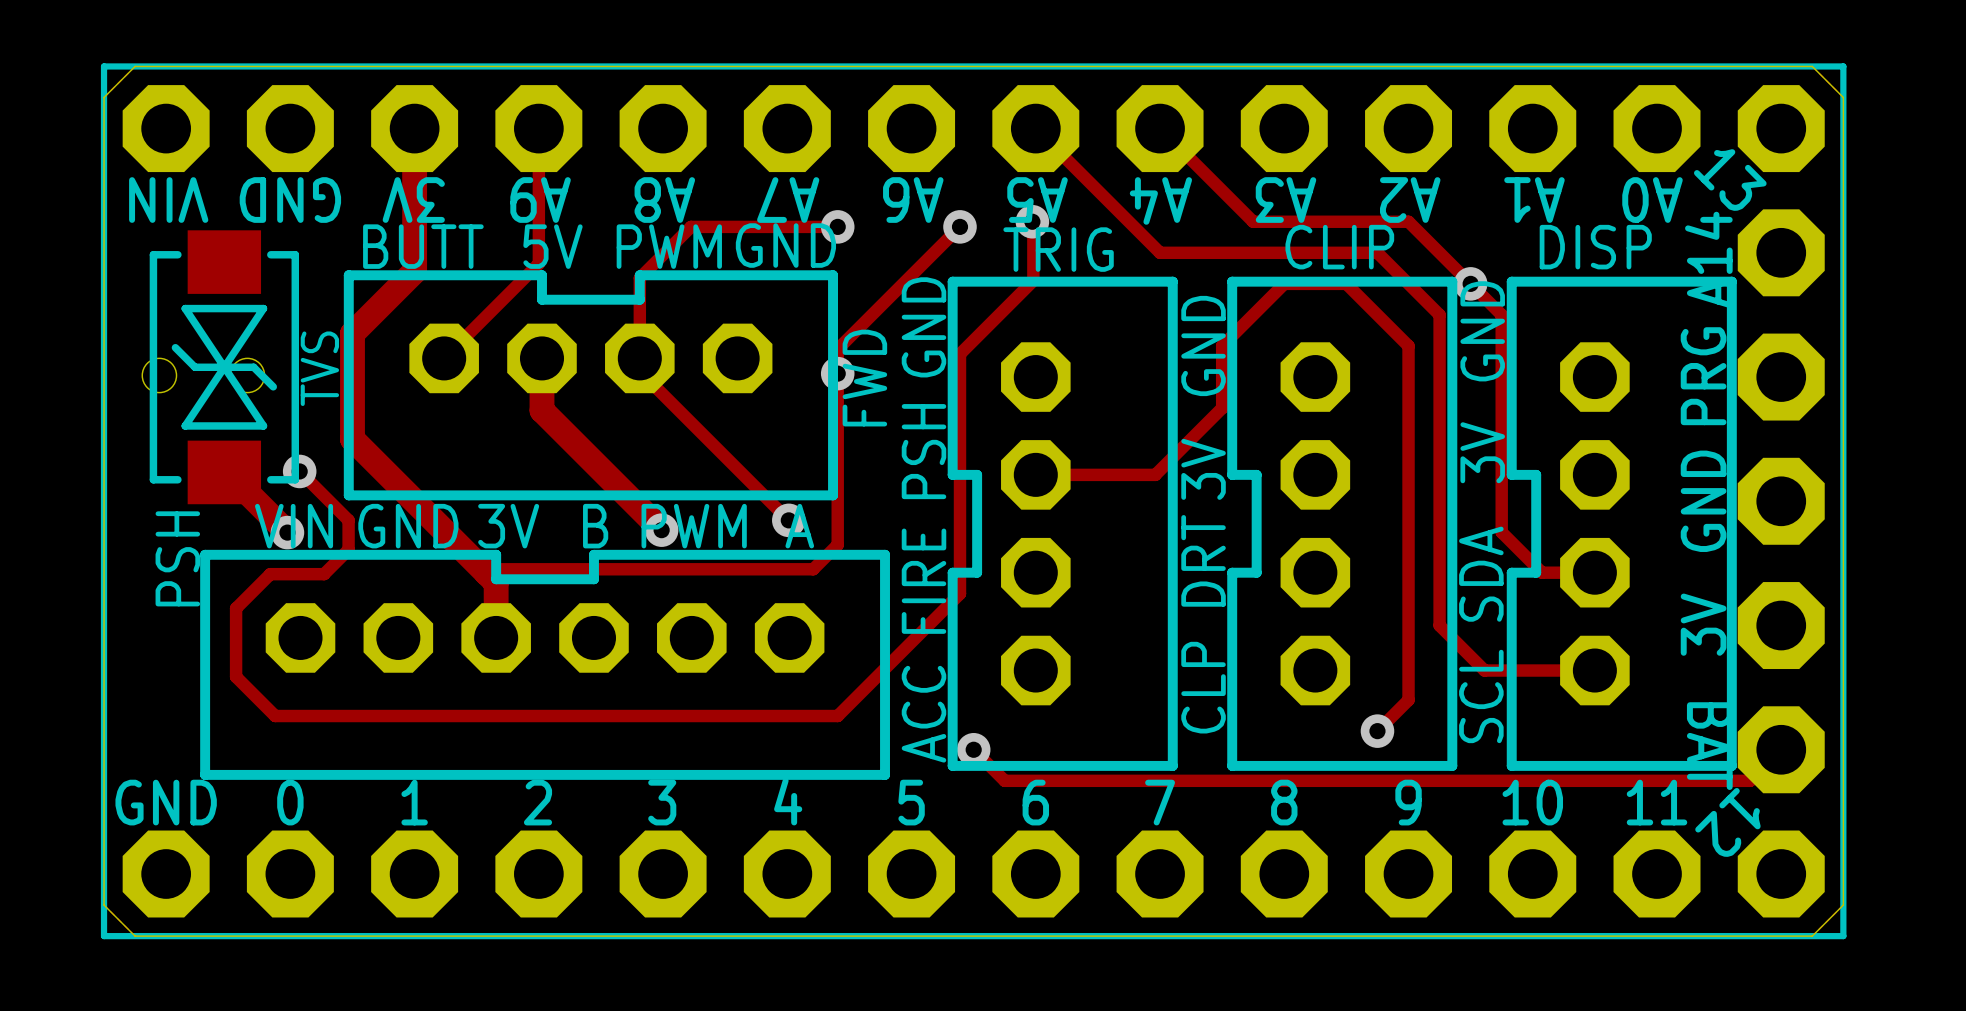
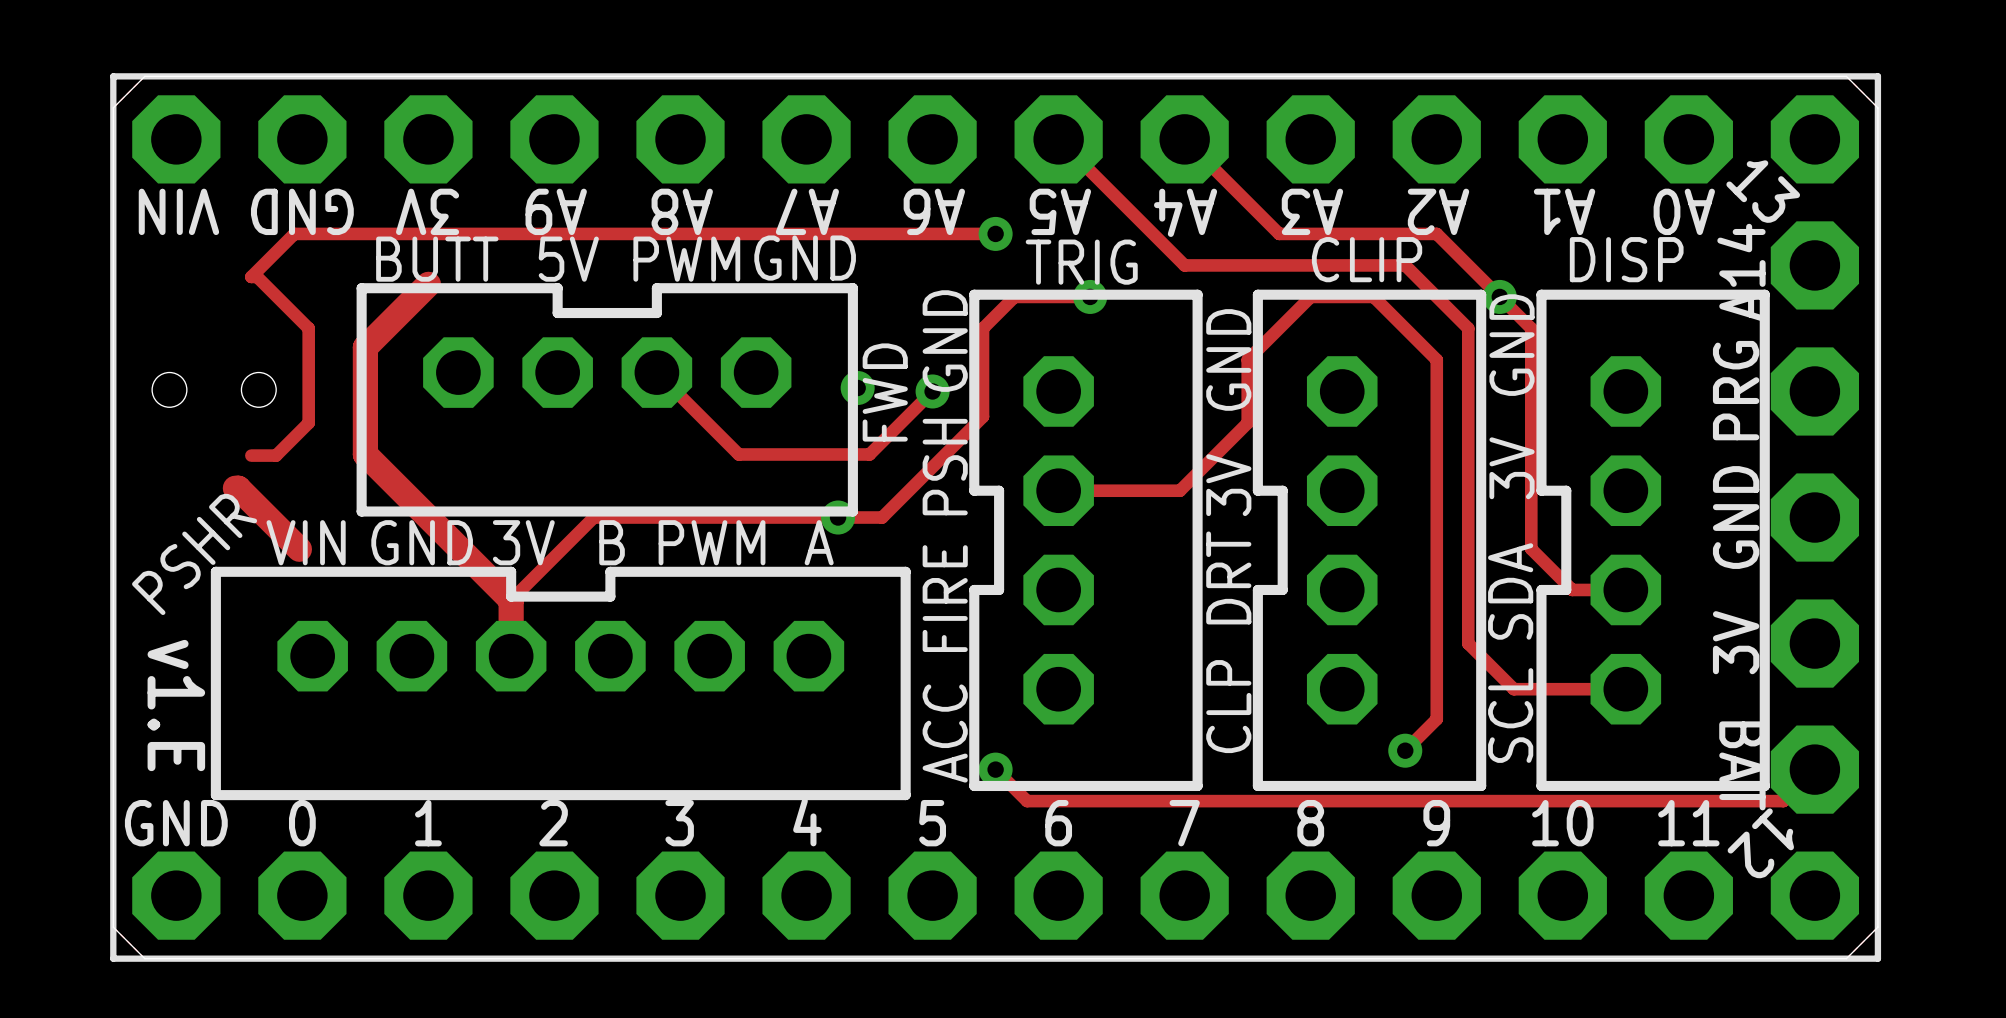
track: (414, 128) (414, 271) -> none
track: (538, 128) (538, 263) (444, 358) -> none
track: none -> (995, 233) (294, 233) (251, 276) (257, 276) (308, 328) (308, 422) (276, 455) (251, 455)
track: (1032, 221) (1033, 280) (960, 354) (960, 593) (837, 716) (275, 716) (236, 676) (236, 608) (270, 574) (324, 574) (348, 549) (348, 520) (299, 471) -> none
via: (1032, 221) -> none
track: (837, 226) (690, 226) (639, 278) (639, 371) (788, 520) -> none
via: (837, 226) -> none
track: (960, 226) (837, 349) (837, 544) (813, 569) (490, 569) (486, 573) -> none
via position: (960, 226) -> (995, 233)
track: none -> (1090, 296) (1014, 296) (983, 328) (983, 416) (882, 517) (593, 517) (511, 600)
via: none -> (1090, 296)
track: (541, 358) (541, 410) (661, 530) -> none
track: none -> (656, 372) (738, 454) (869, 454) (932, 391)
TVS: (224, 367) -> none
via: none -> (932, 391)
via: (299, 471) -> none
via position: (788, 520) -> (838, 517)
via: (661, 530) -> none
via: (287, 532) -> none
PSH name: PSH (177, 558) -> PSHR (194, 554)
text: none -> v1.E (176, 705)

